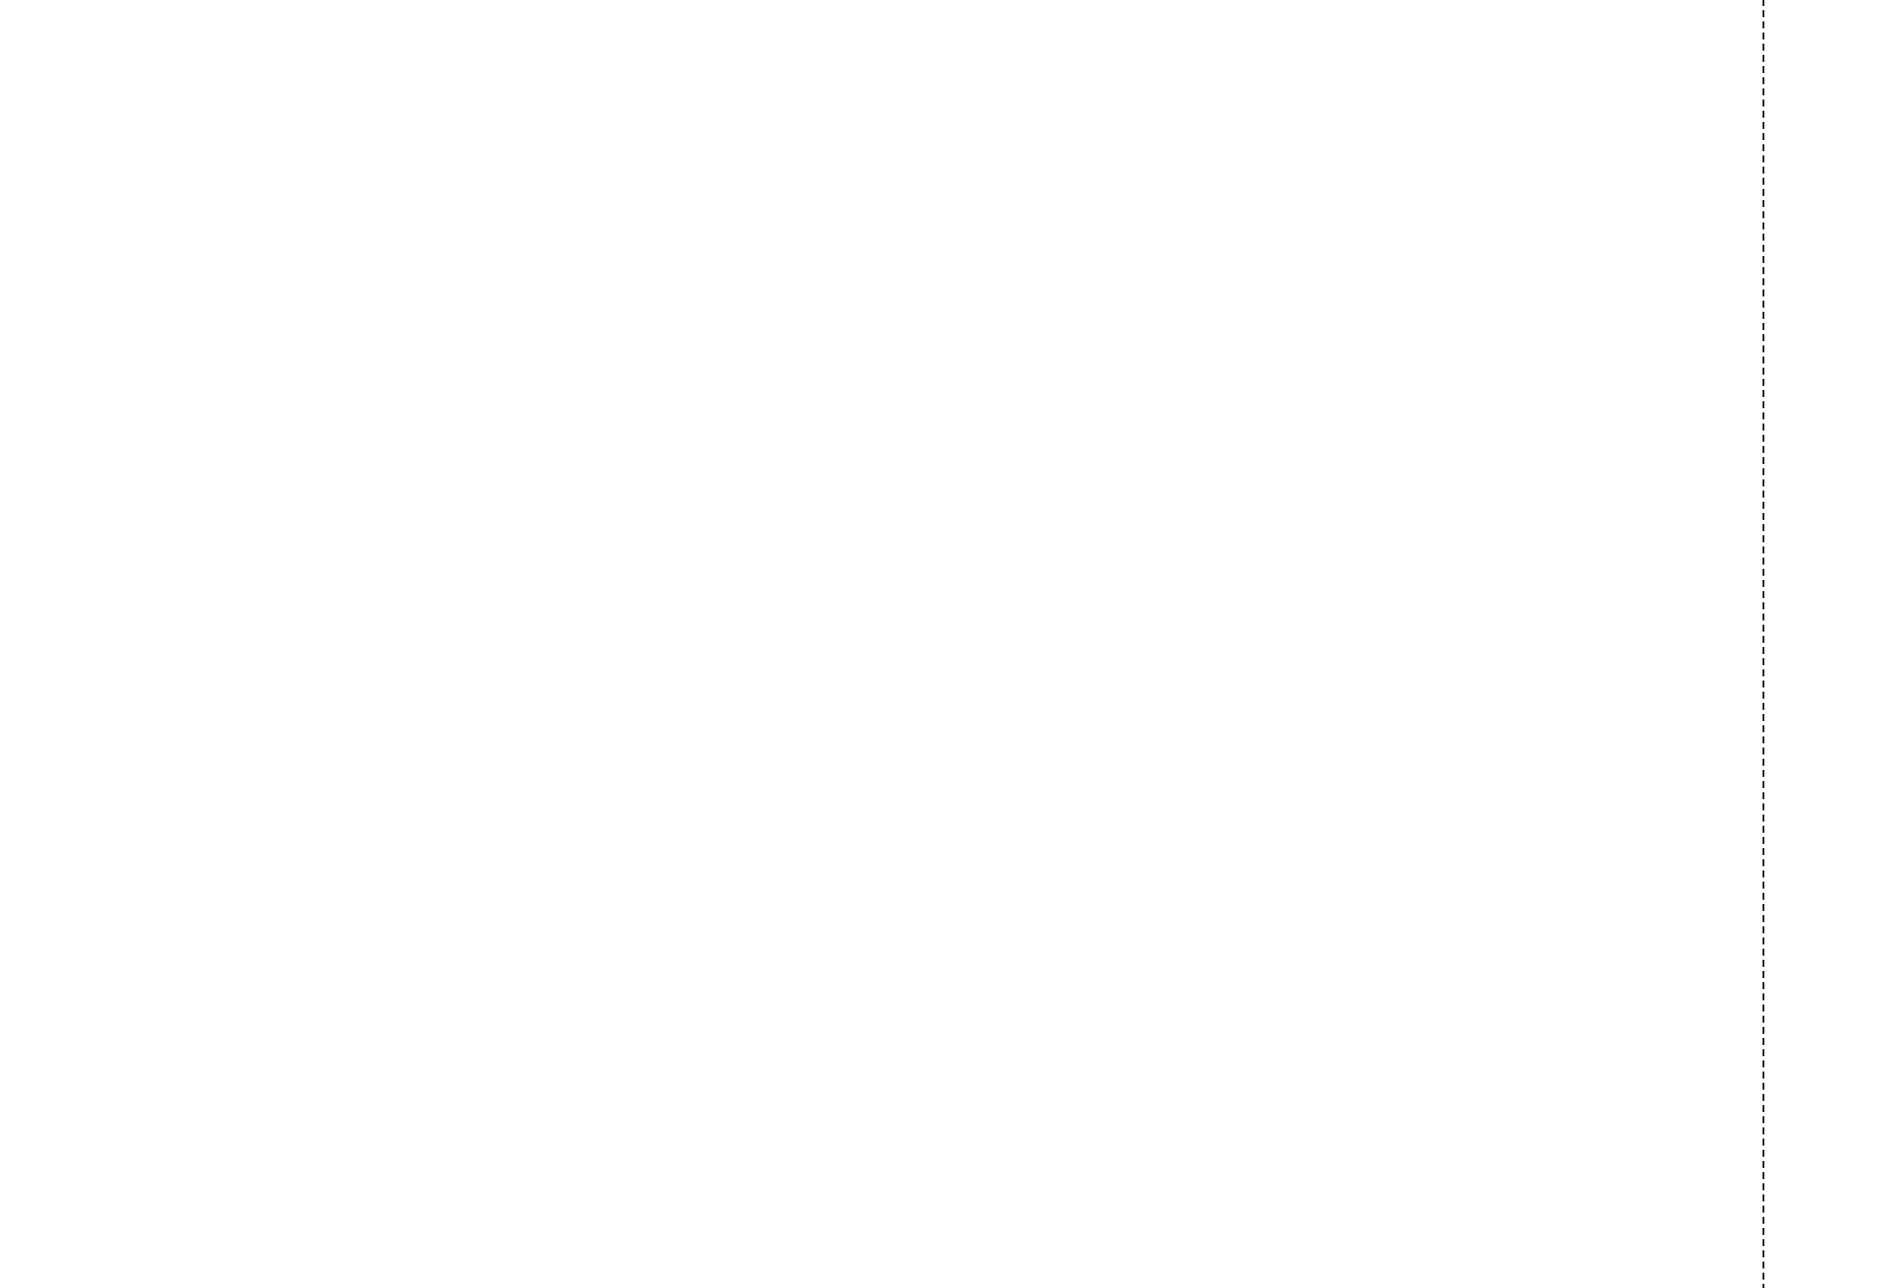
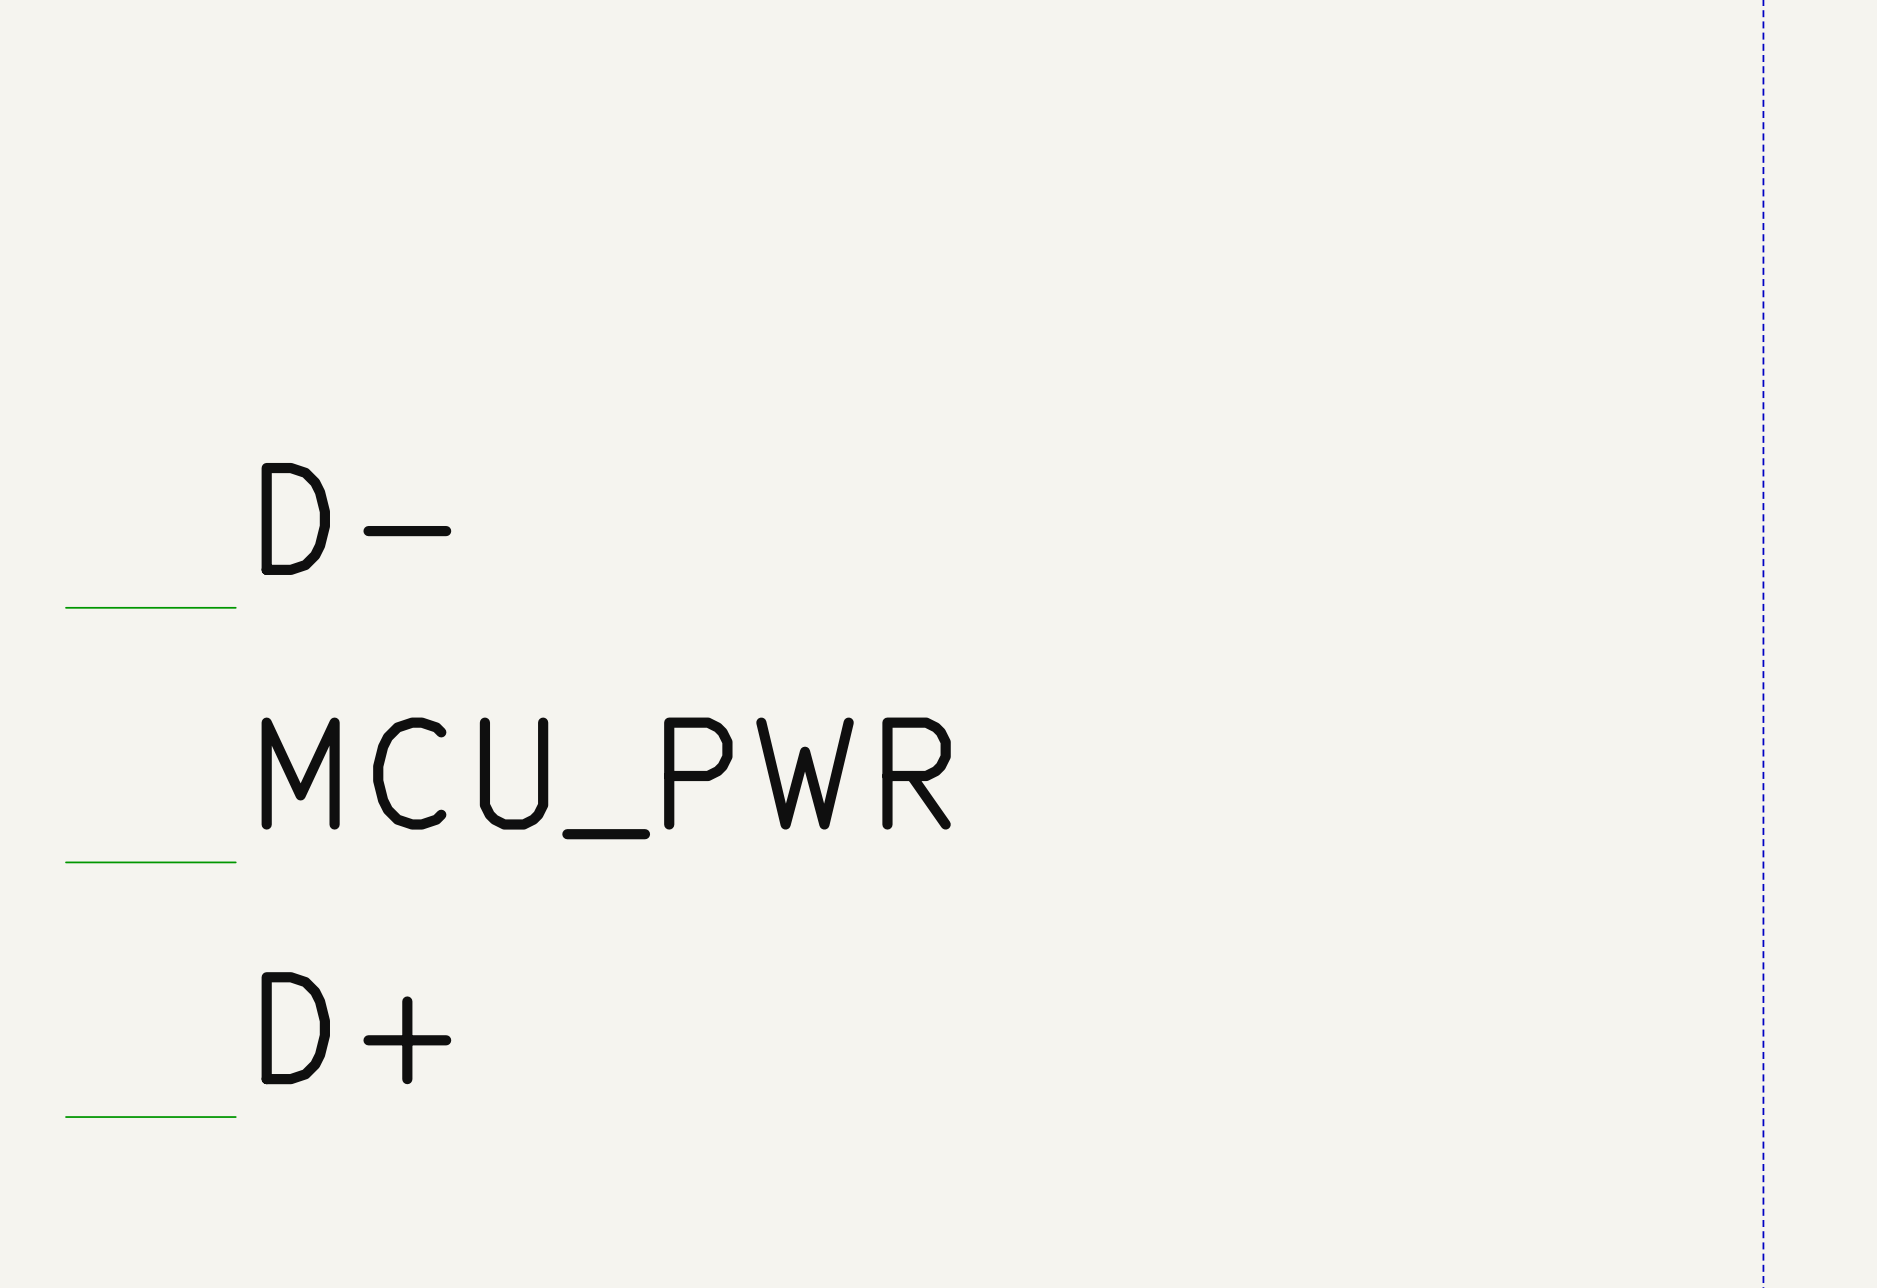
label: none -> D- (356, 518)
wire: none -> (66, 607) (235, 607)
label: none -> MCU_PWR (606, 778)
wire: none -> (66, 862) (235, 862)
label: none -> D+ (356, 1028)
wire: none -> (66, 1117) (235, 1117)

